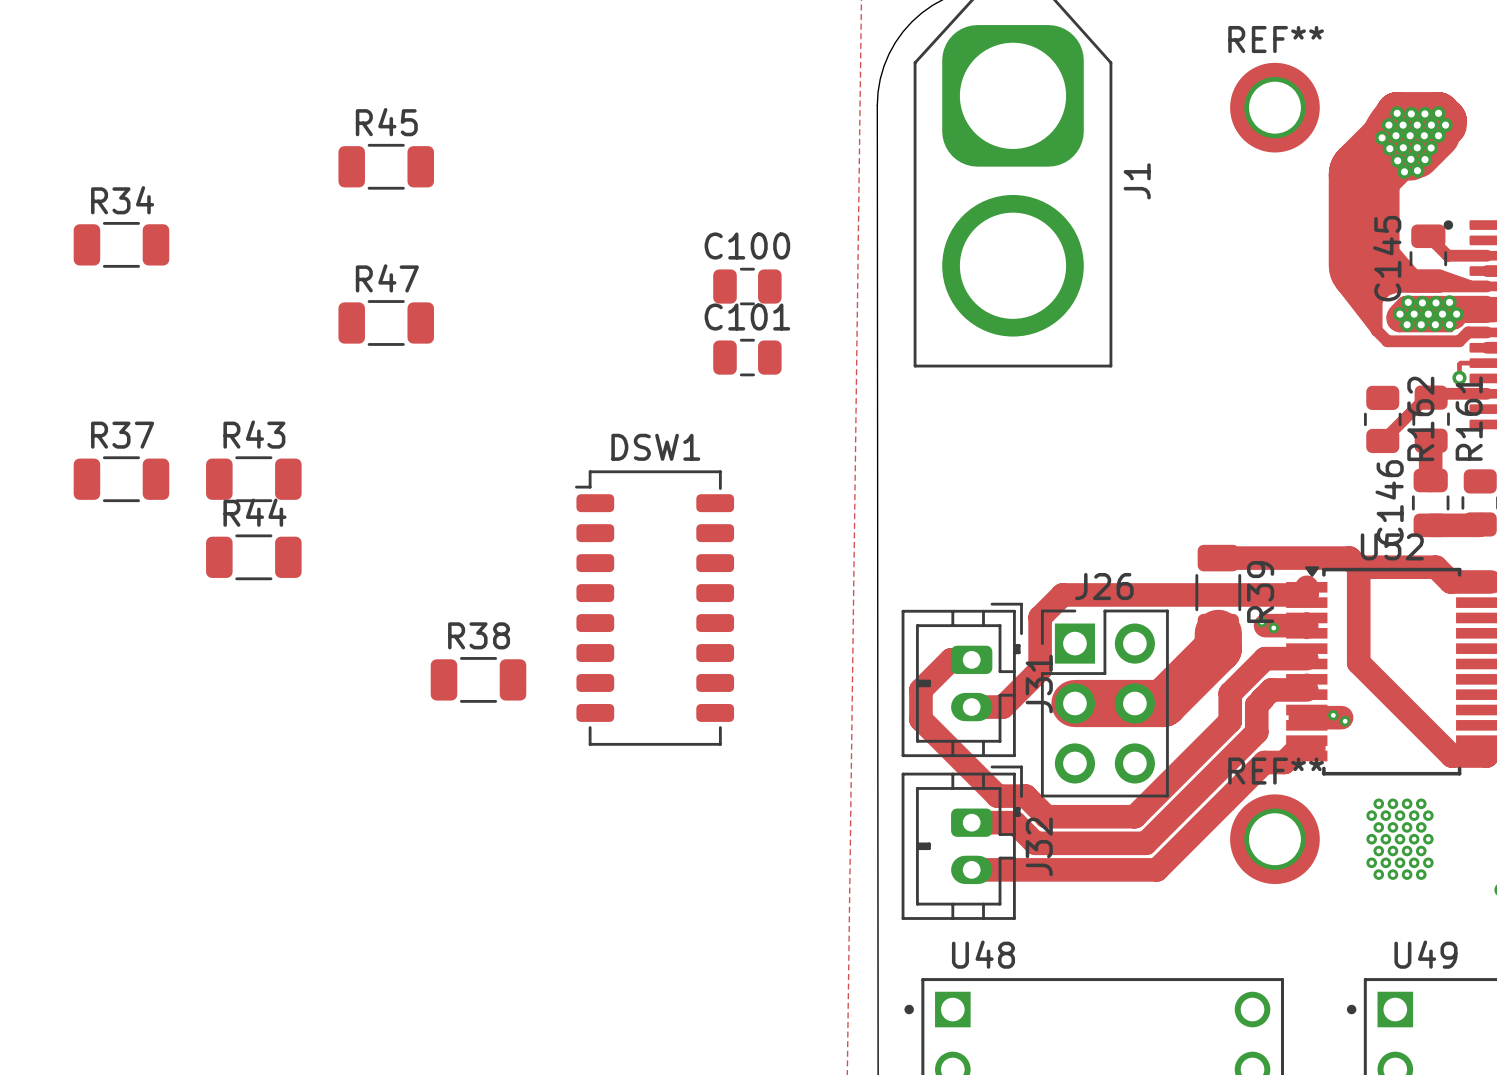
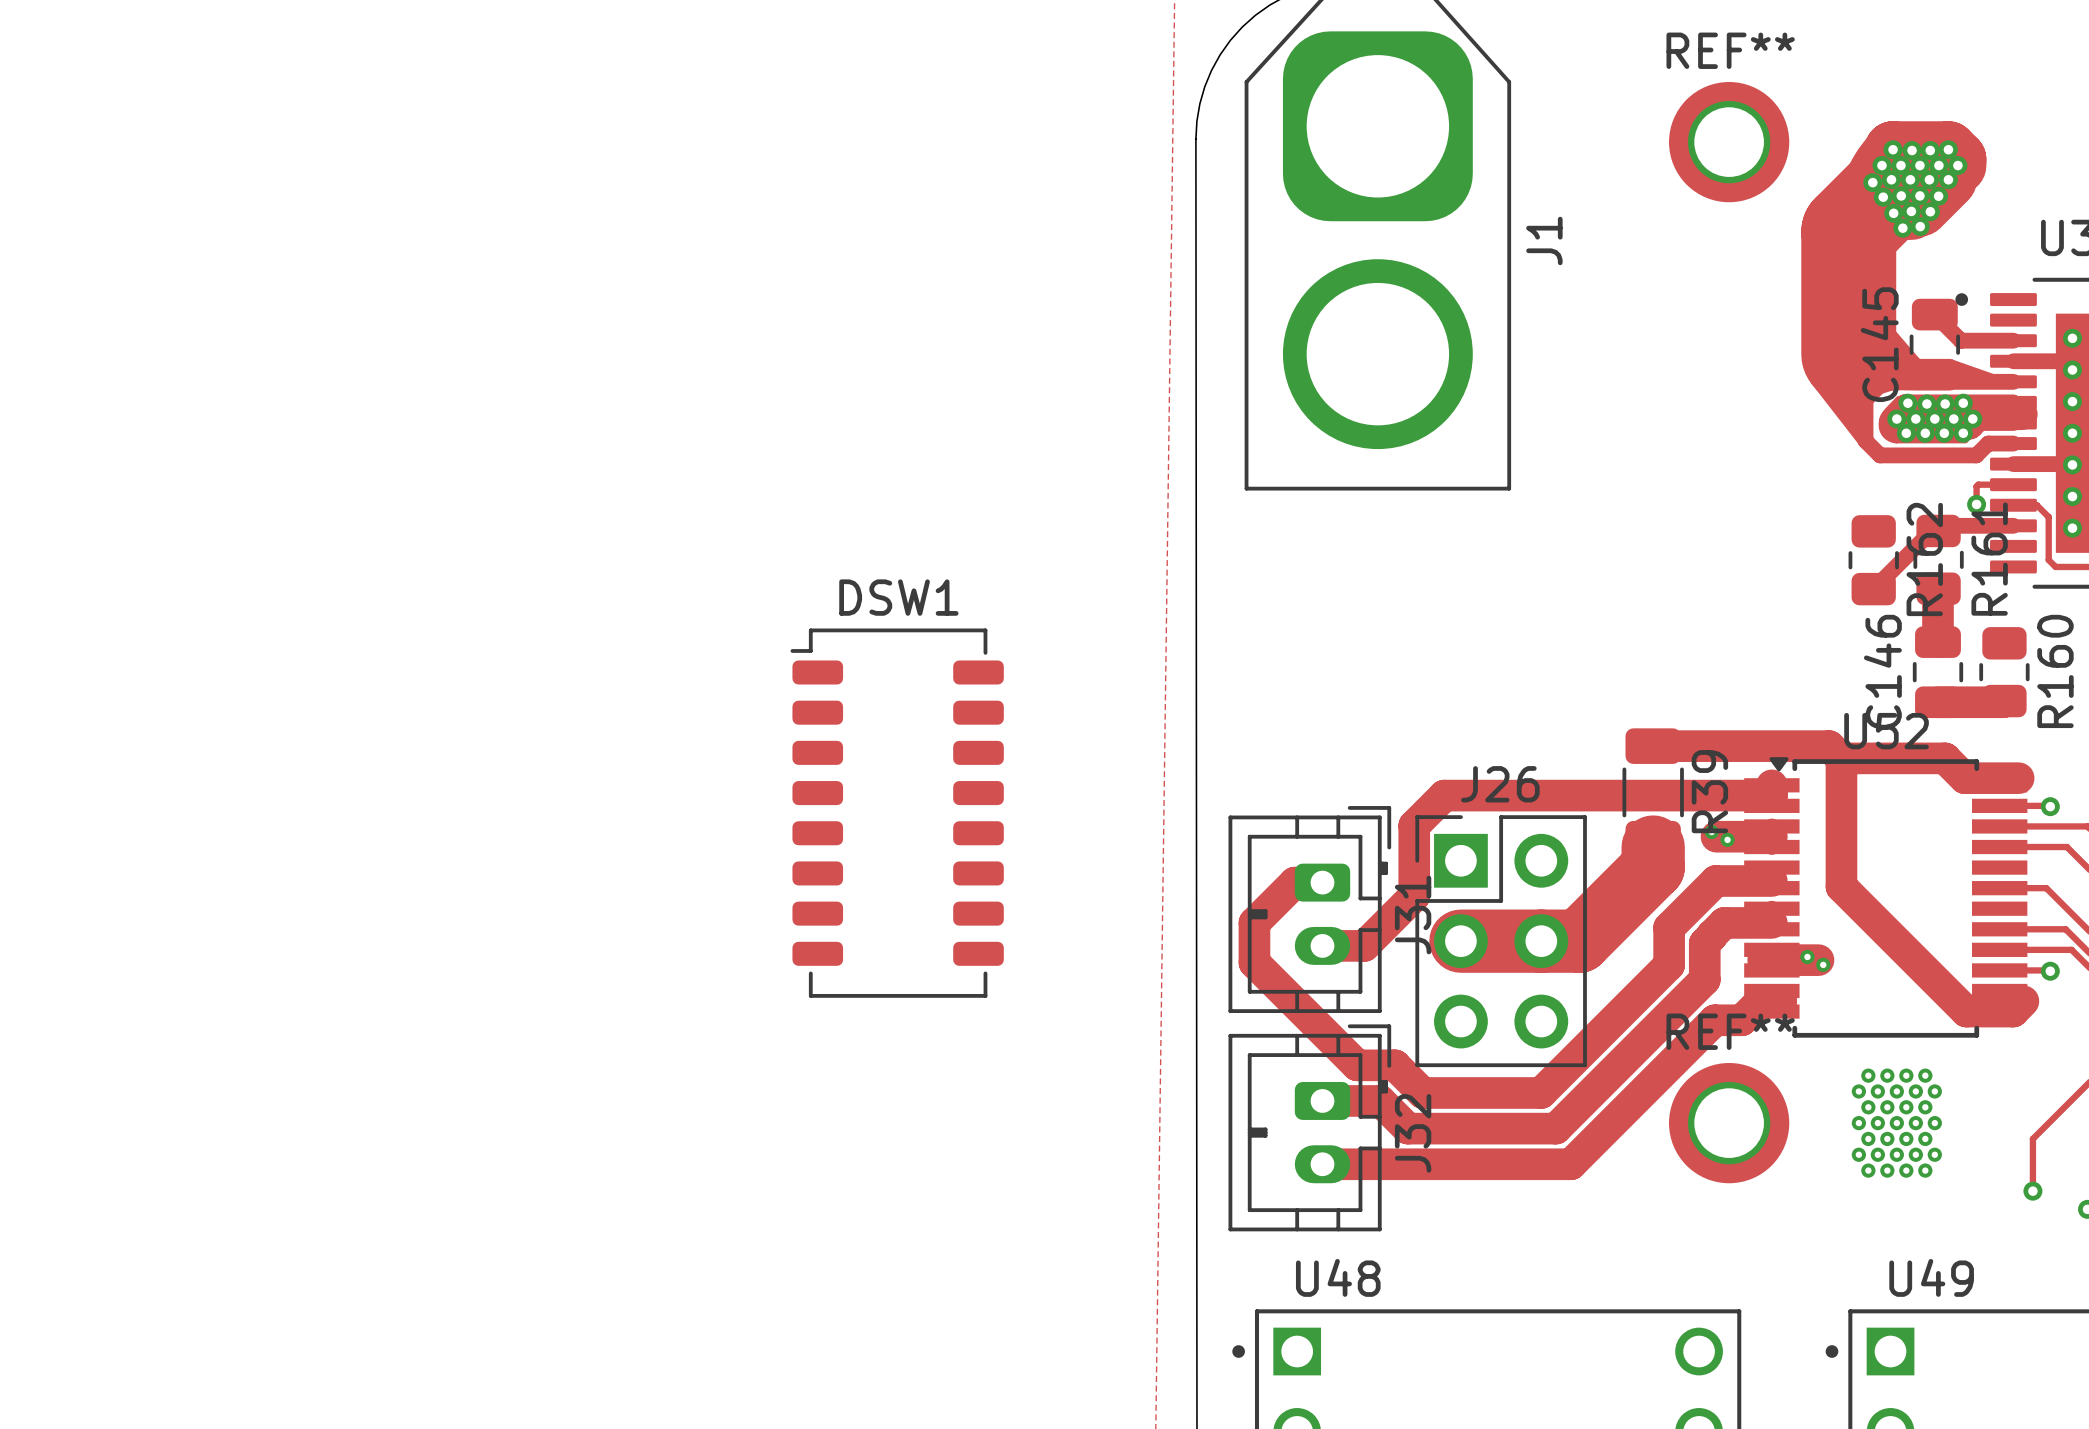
R45: (386, 166) -> none
R34: (121, 244) -> none
C100: (747, 286) -> none
R47: (386, 322) -> none
C101: (747, 357) -> none
R37: (121, 479) -> none
R43: (253, 479) -> none
R44: (253, 557) -> none
R38: (478, 679) -> none

